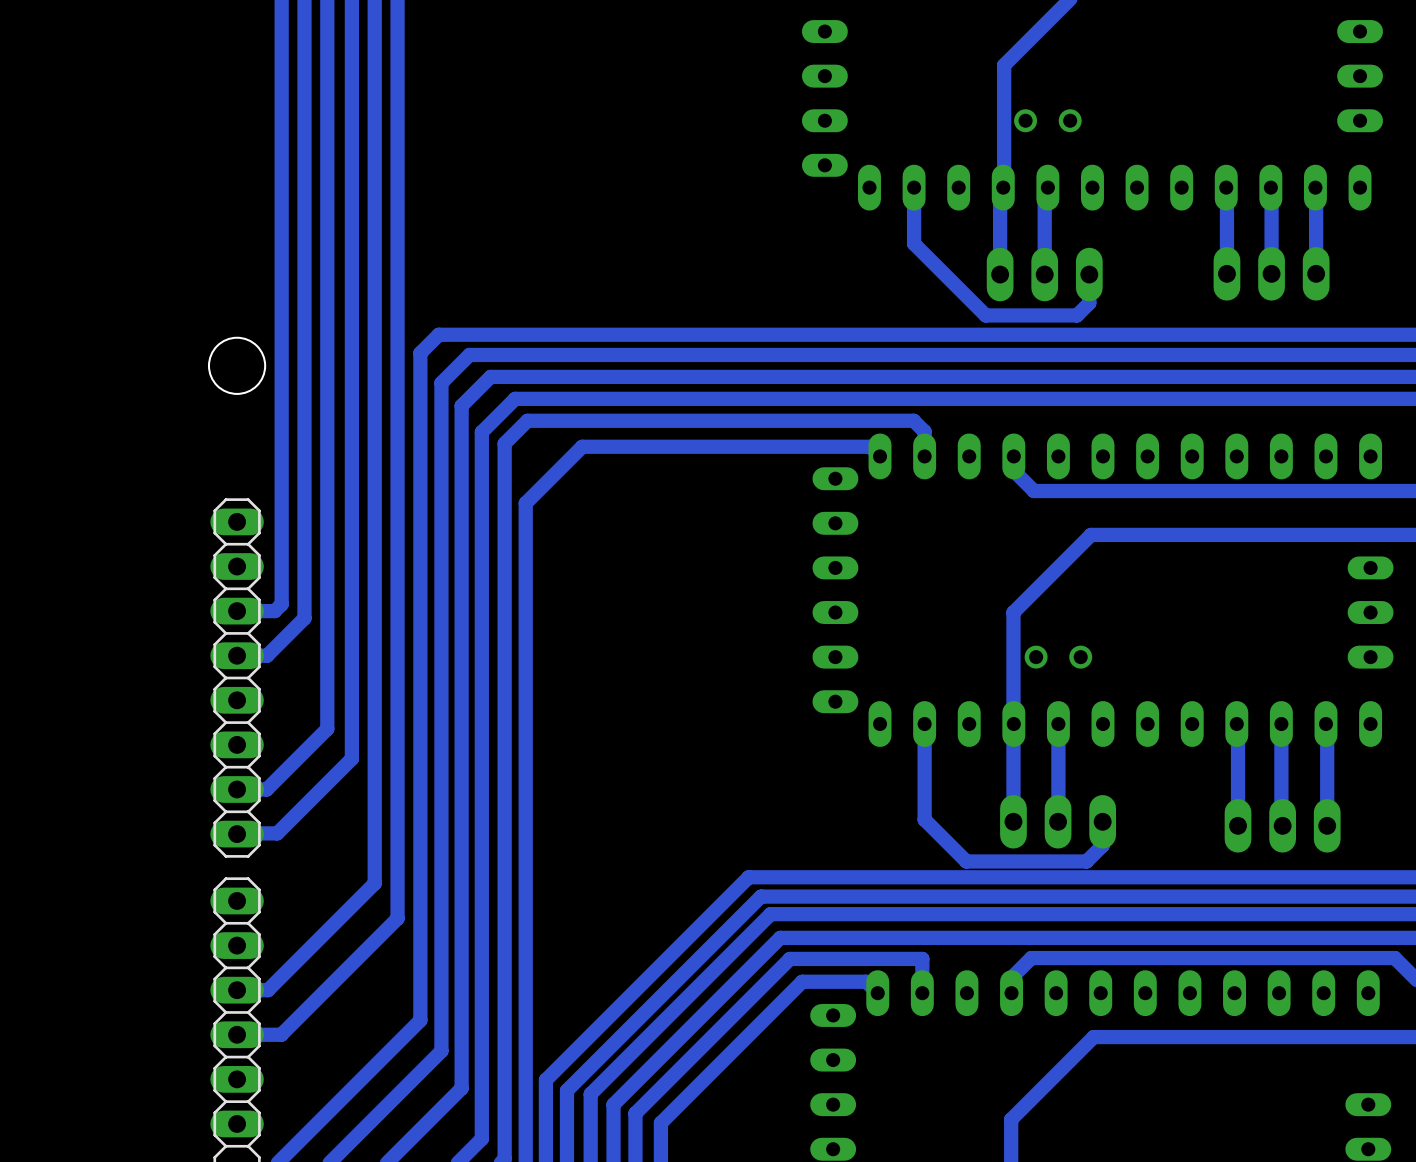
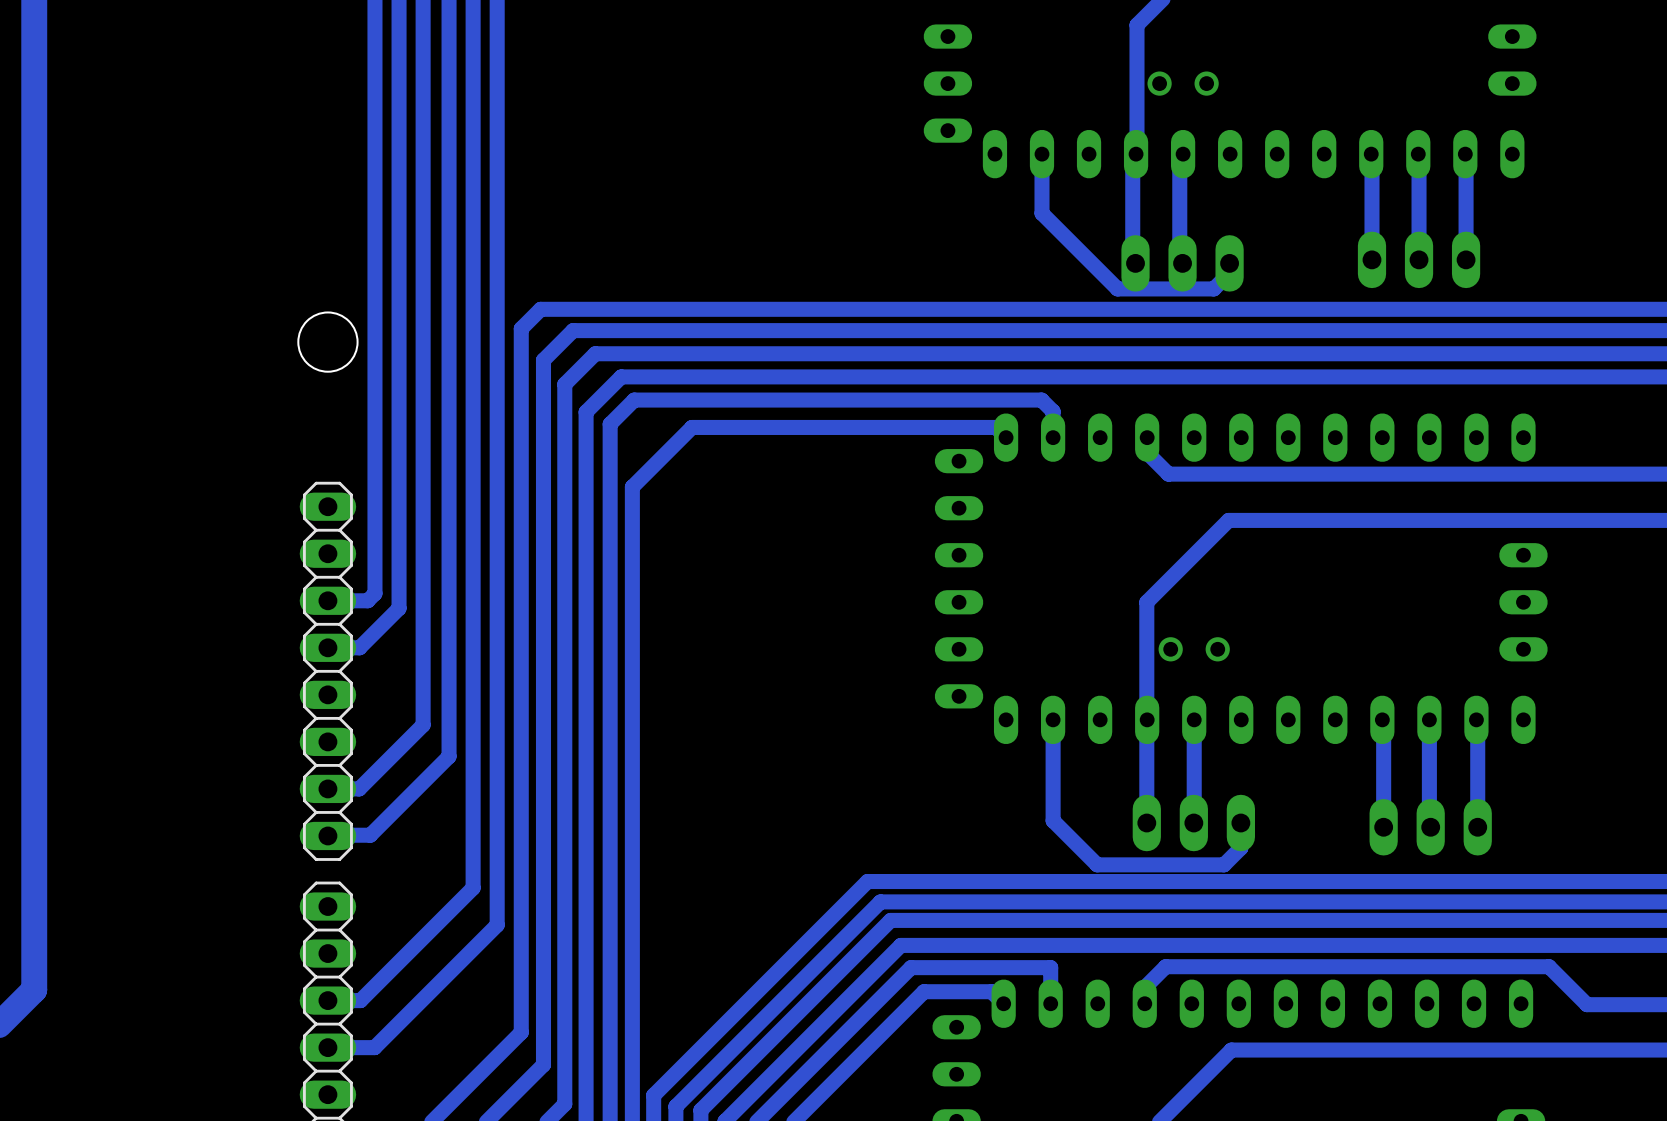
part position: (1271, 273) -> (1419, 259)
part position: (1044, 274) -> (1182, 263)

